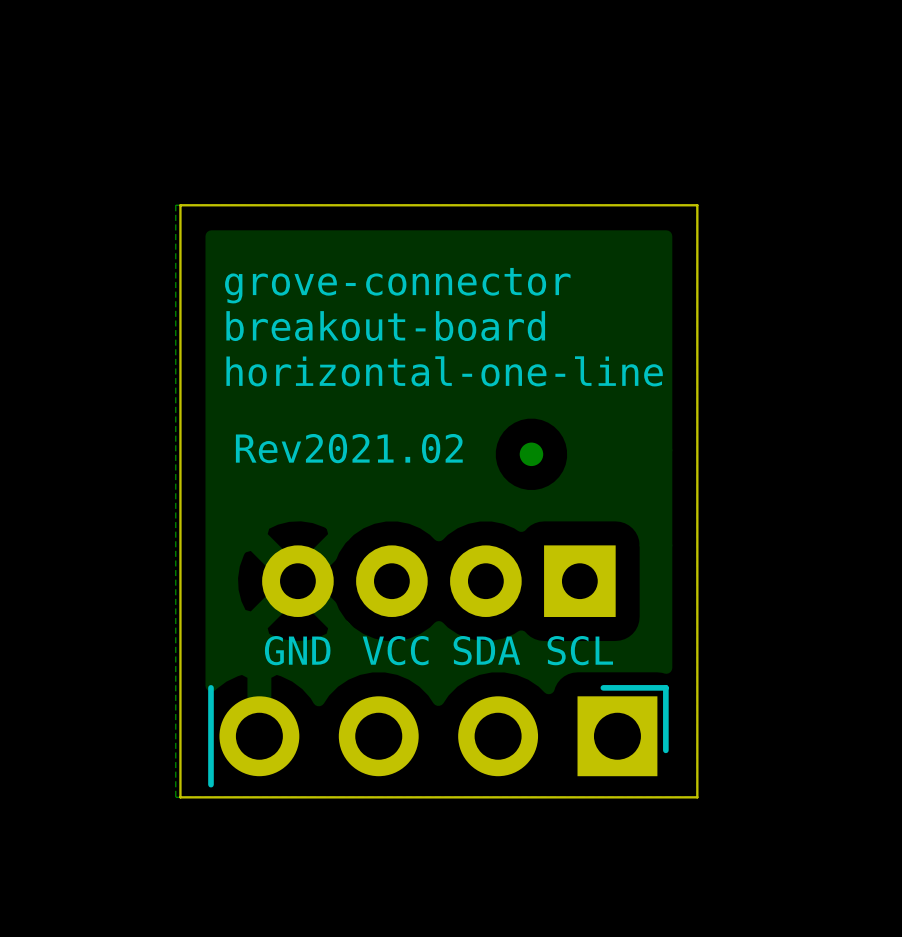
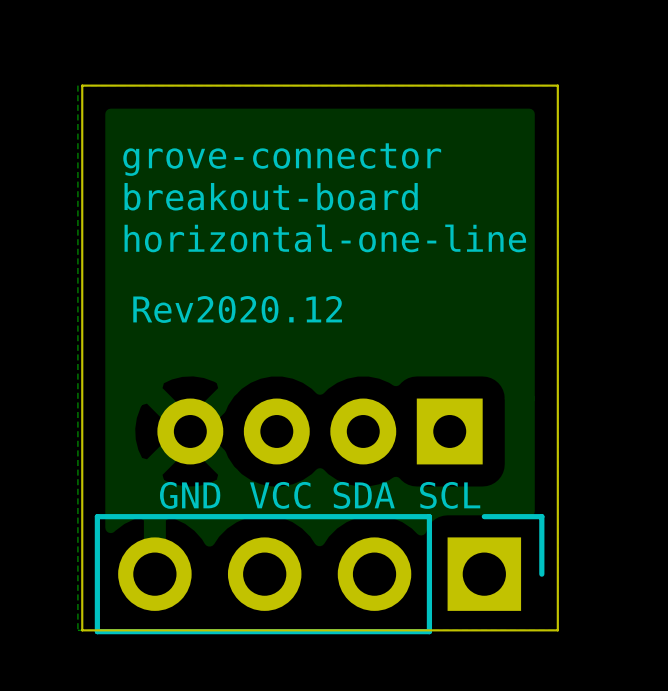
text: Rev2021.02 (349, 448) -> Rev2020.12 (237, 309)
part: (531, 454) -> none
part footprint: [208, 685, 669, 788] -> [94, 514, 545, 635]

